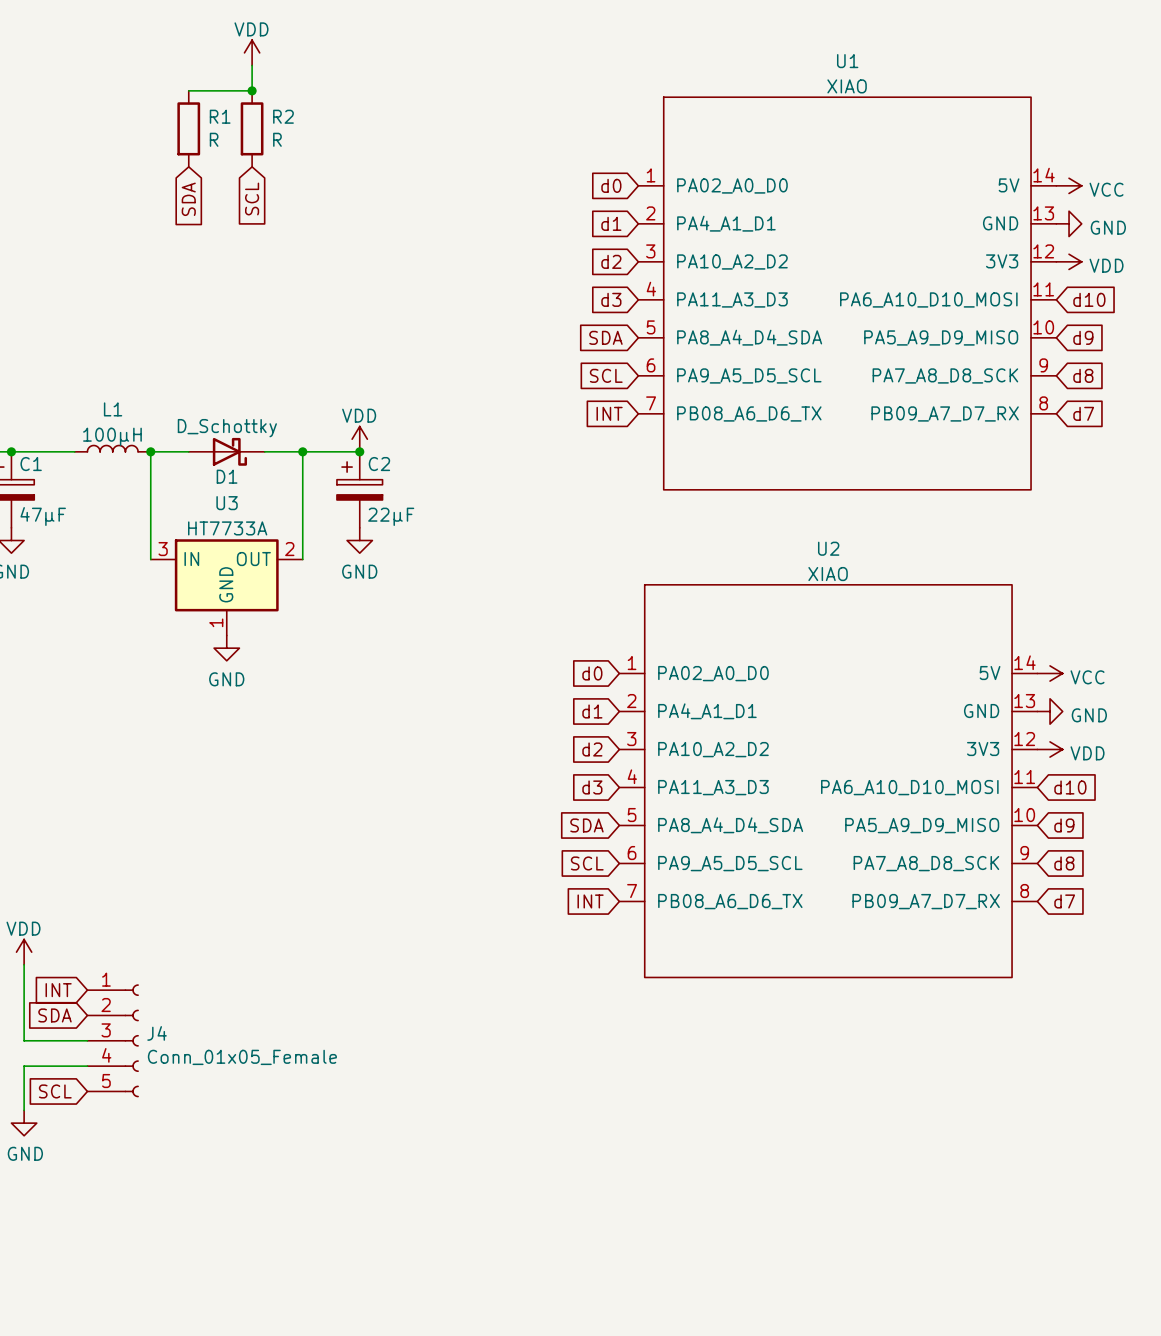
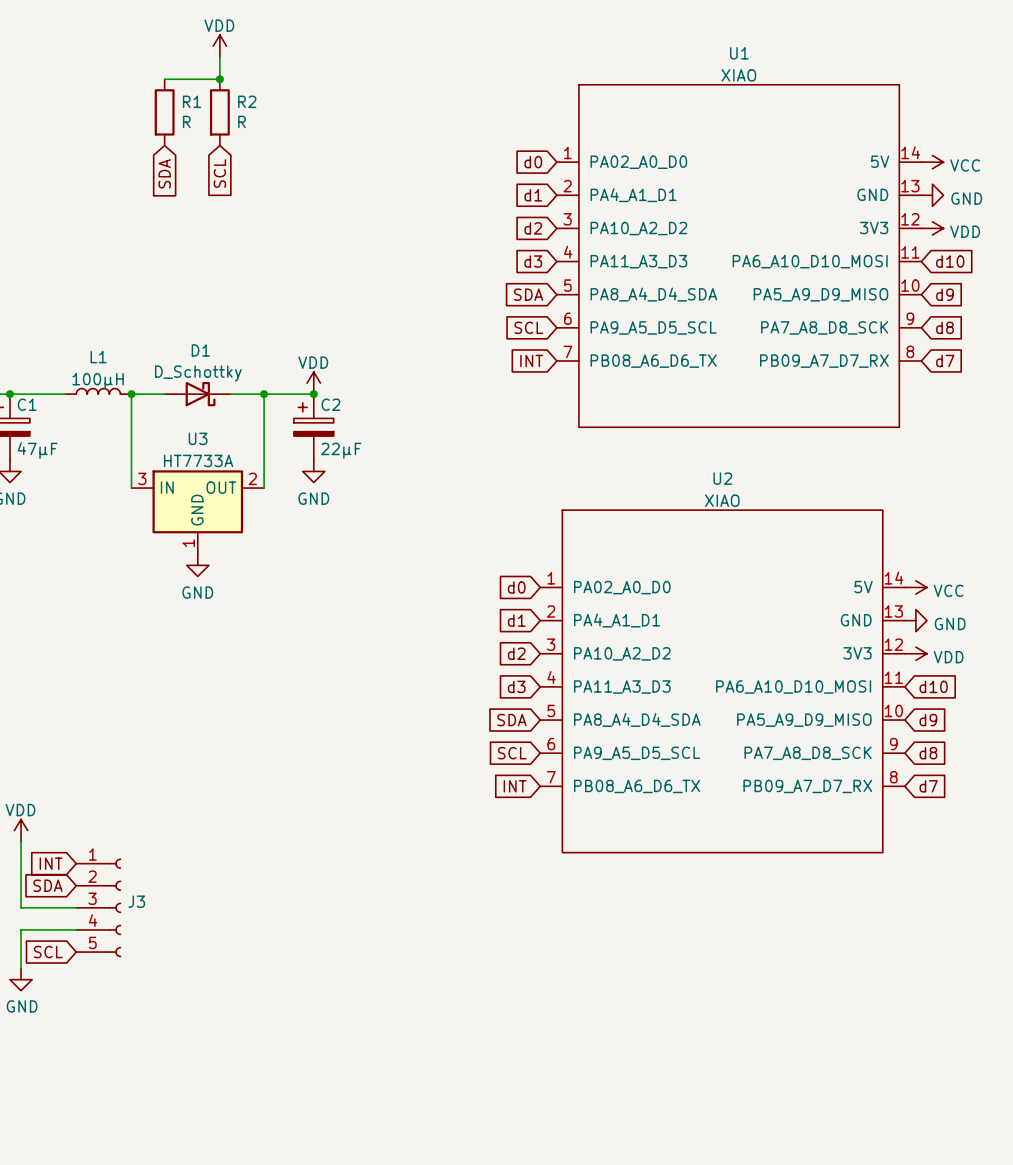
D1 name position: D1 (227, 476) -> D1 (200, 350)
J4 name: J4 (157, 1033) -> J3 (136, 901)
J4 value: Conn_01x05_Female (242, 1057) -> none

